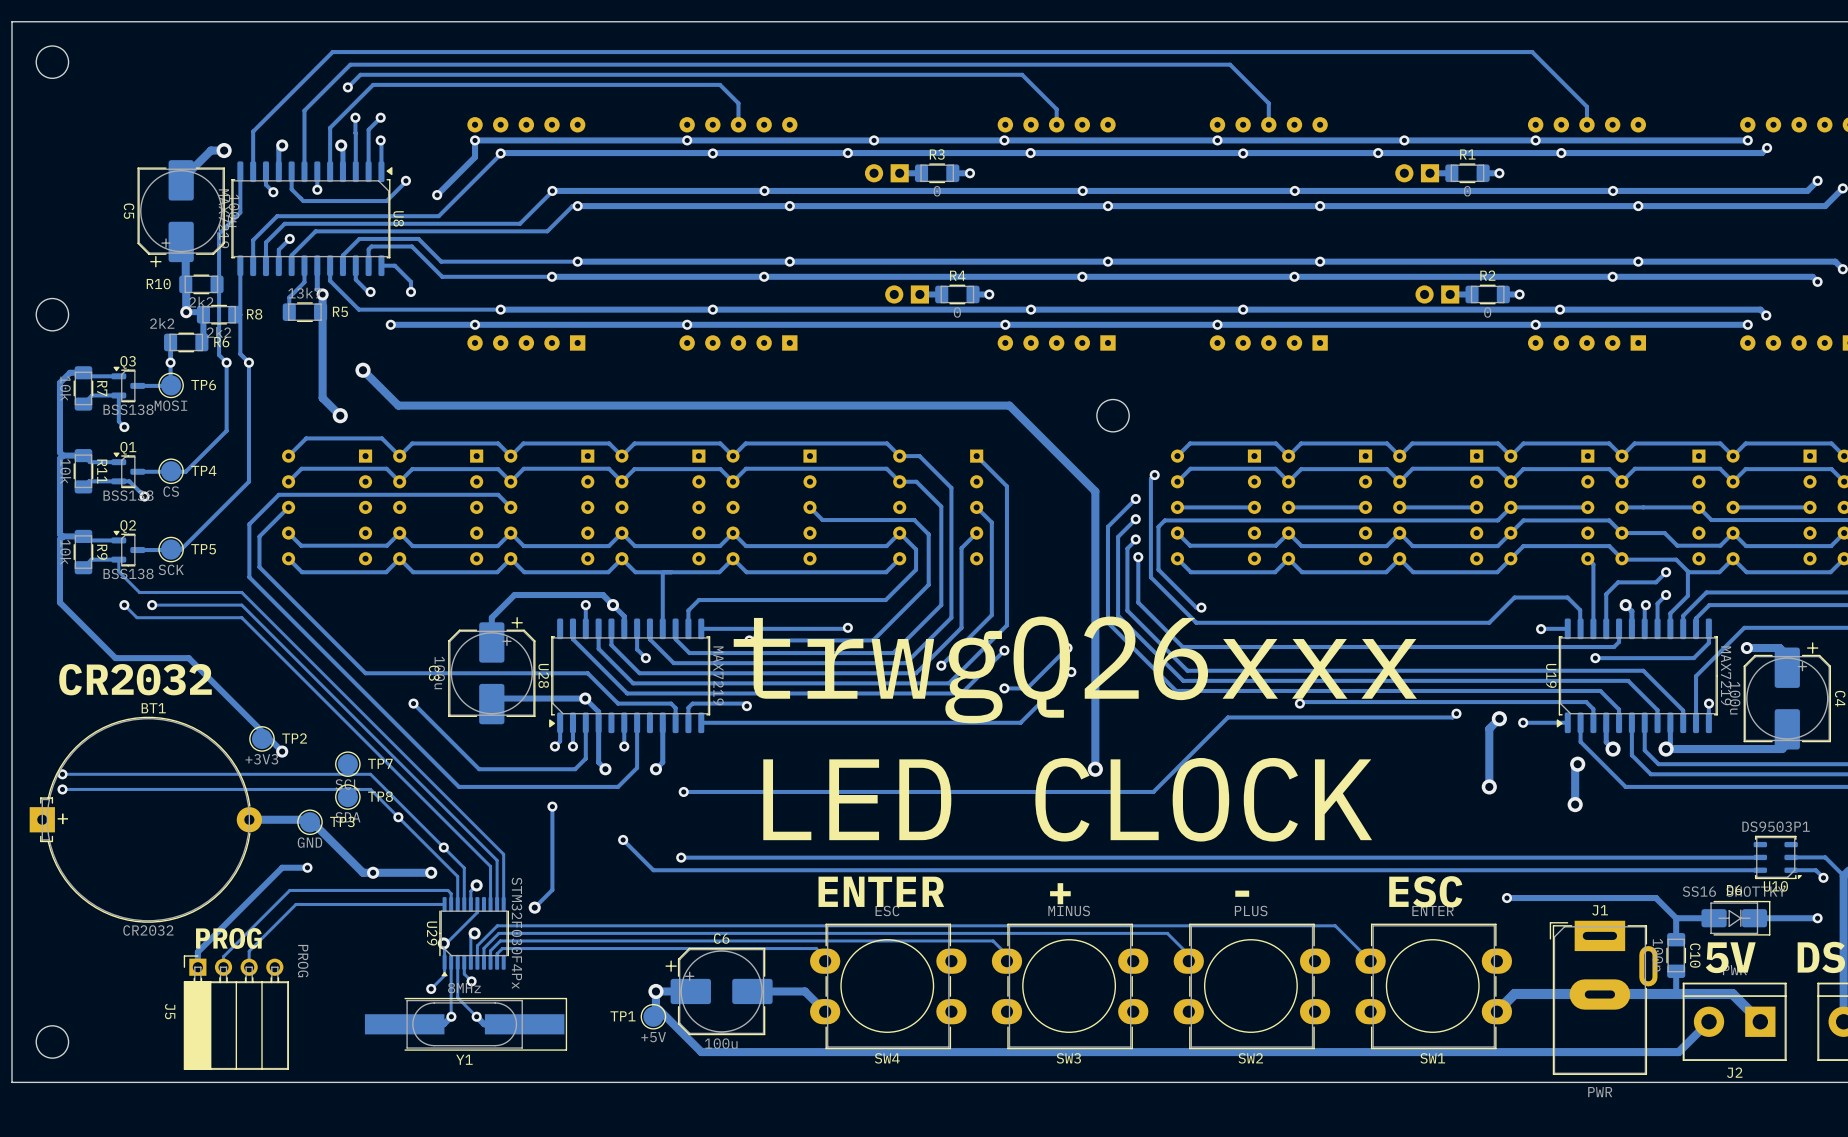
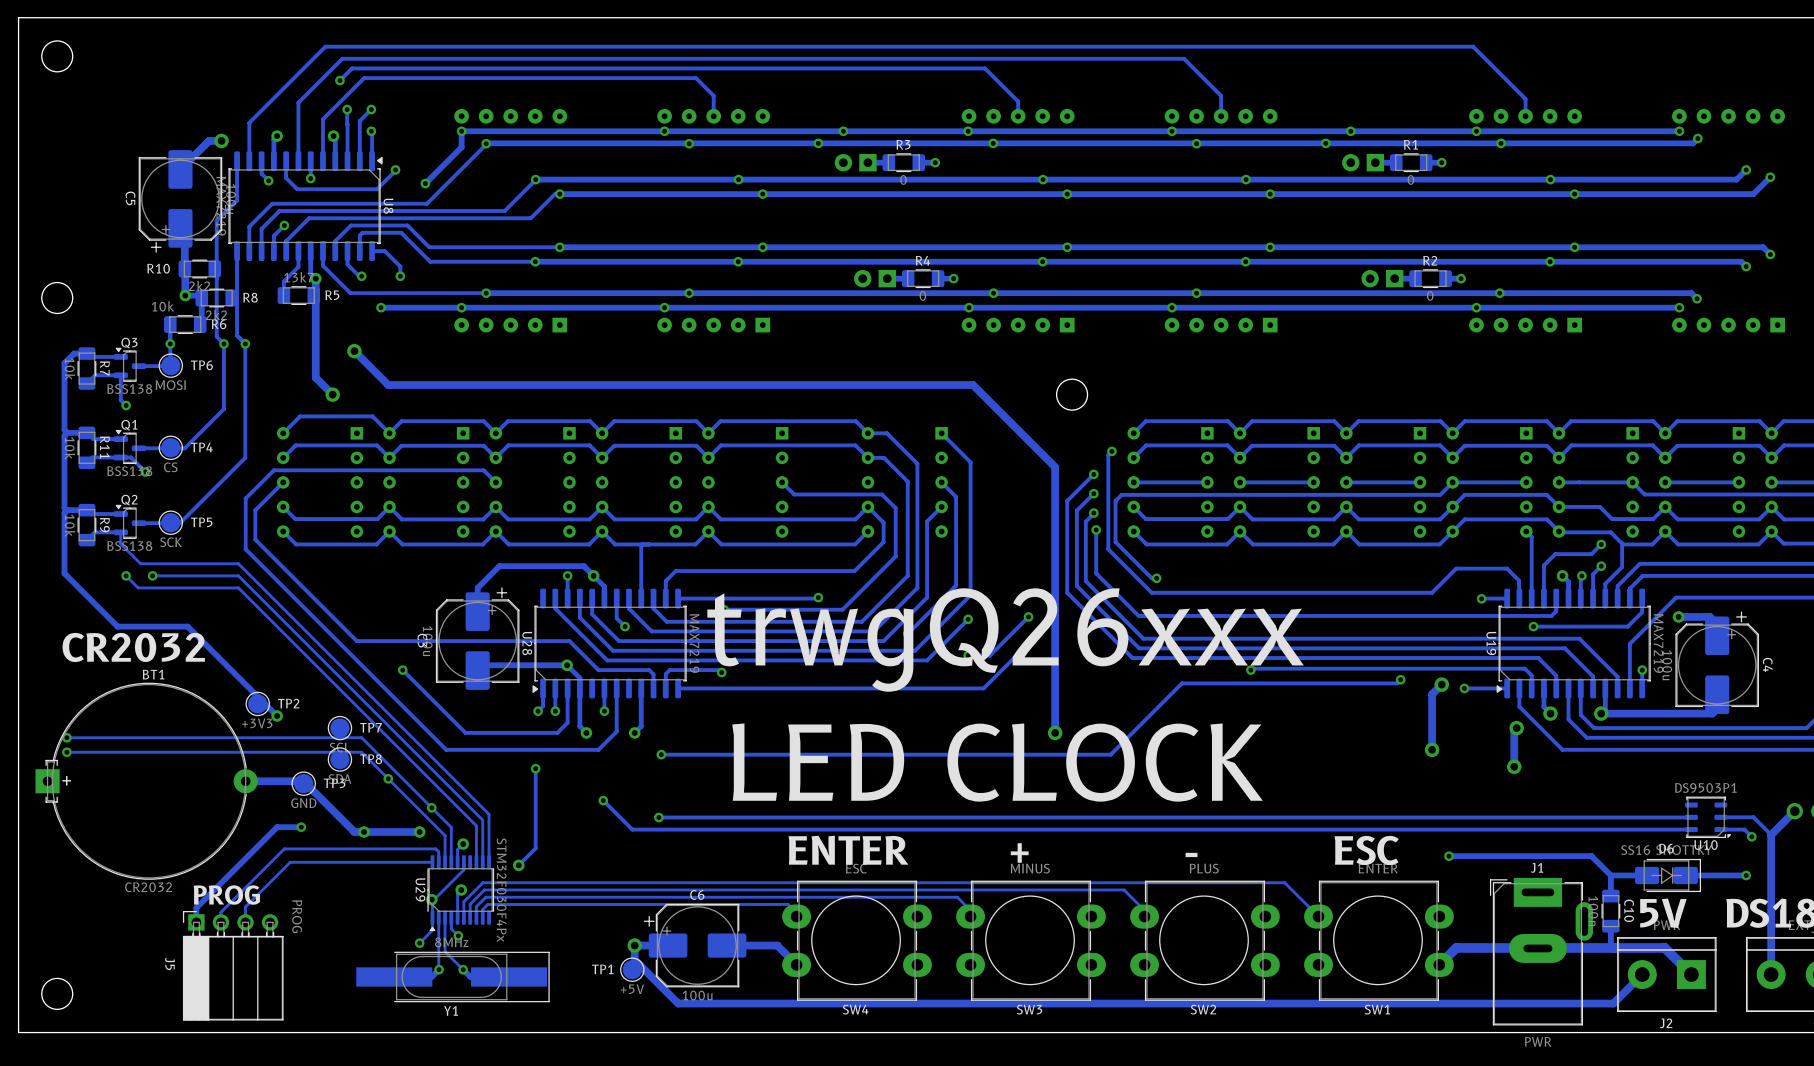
R6 value: 2k2 (162, 323) -> 10k (162, 306)

